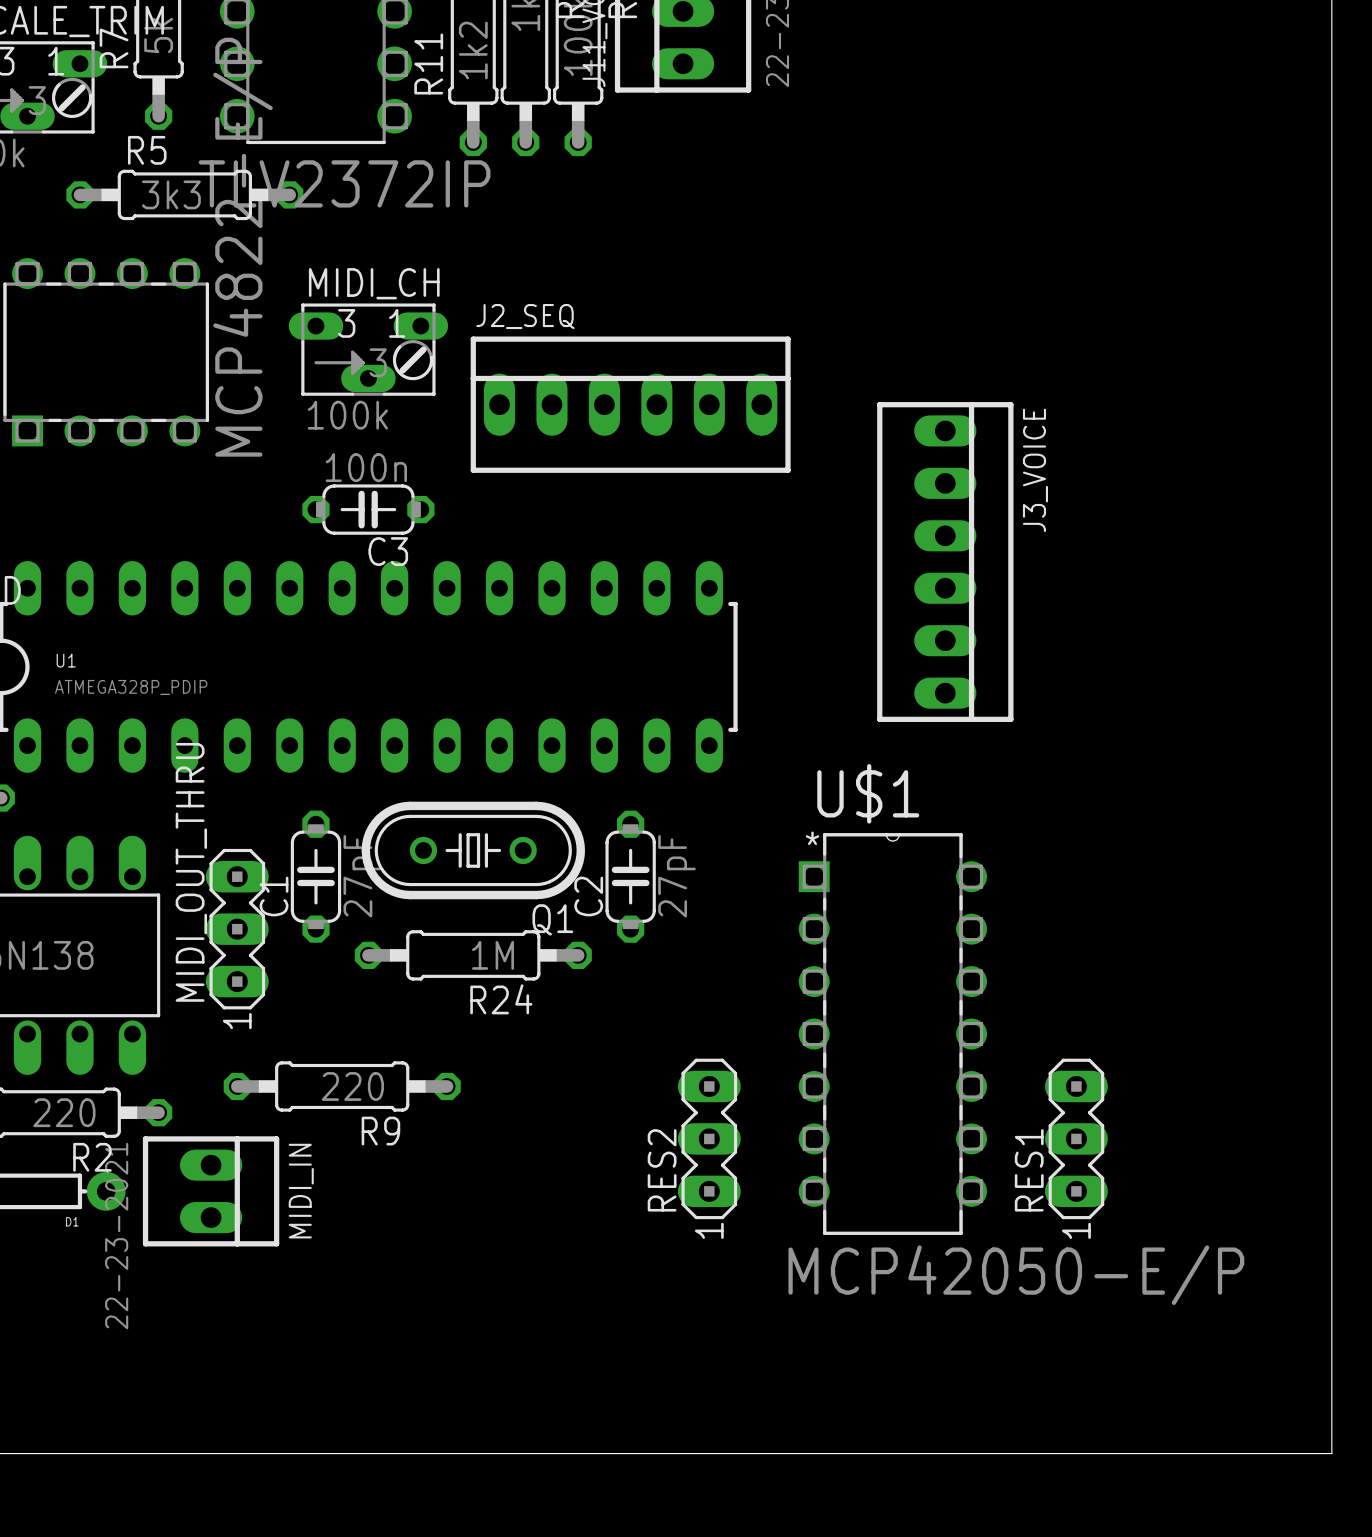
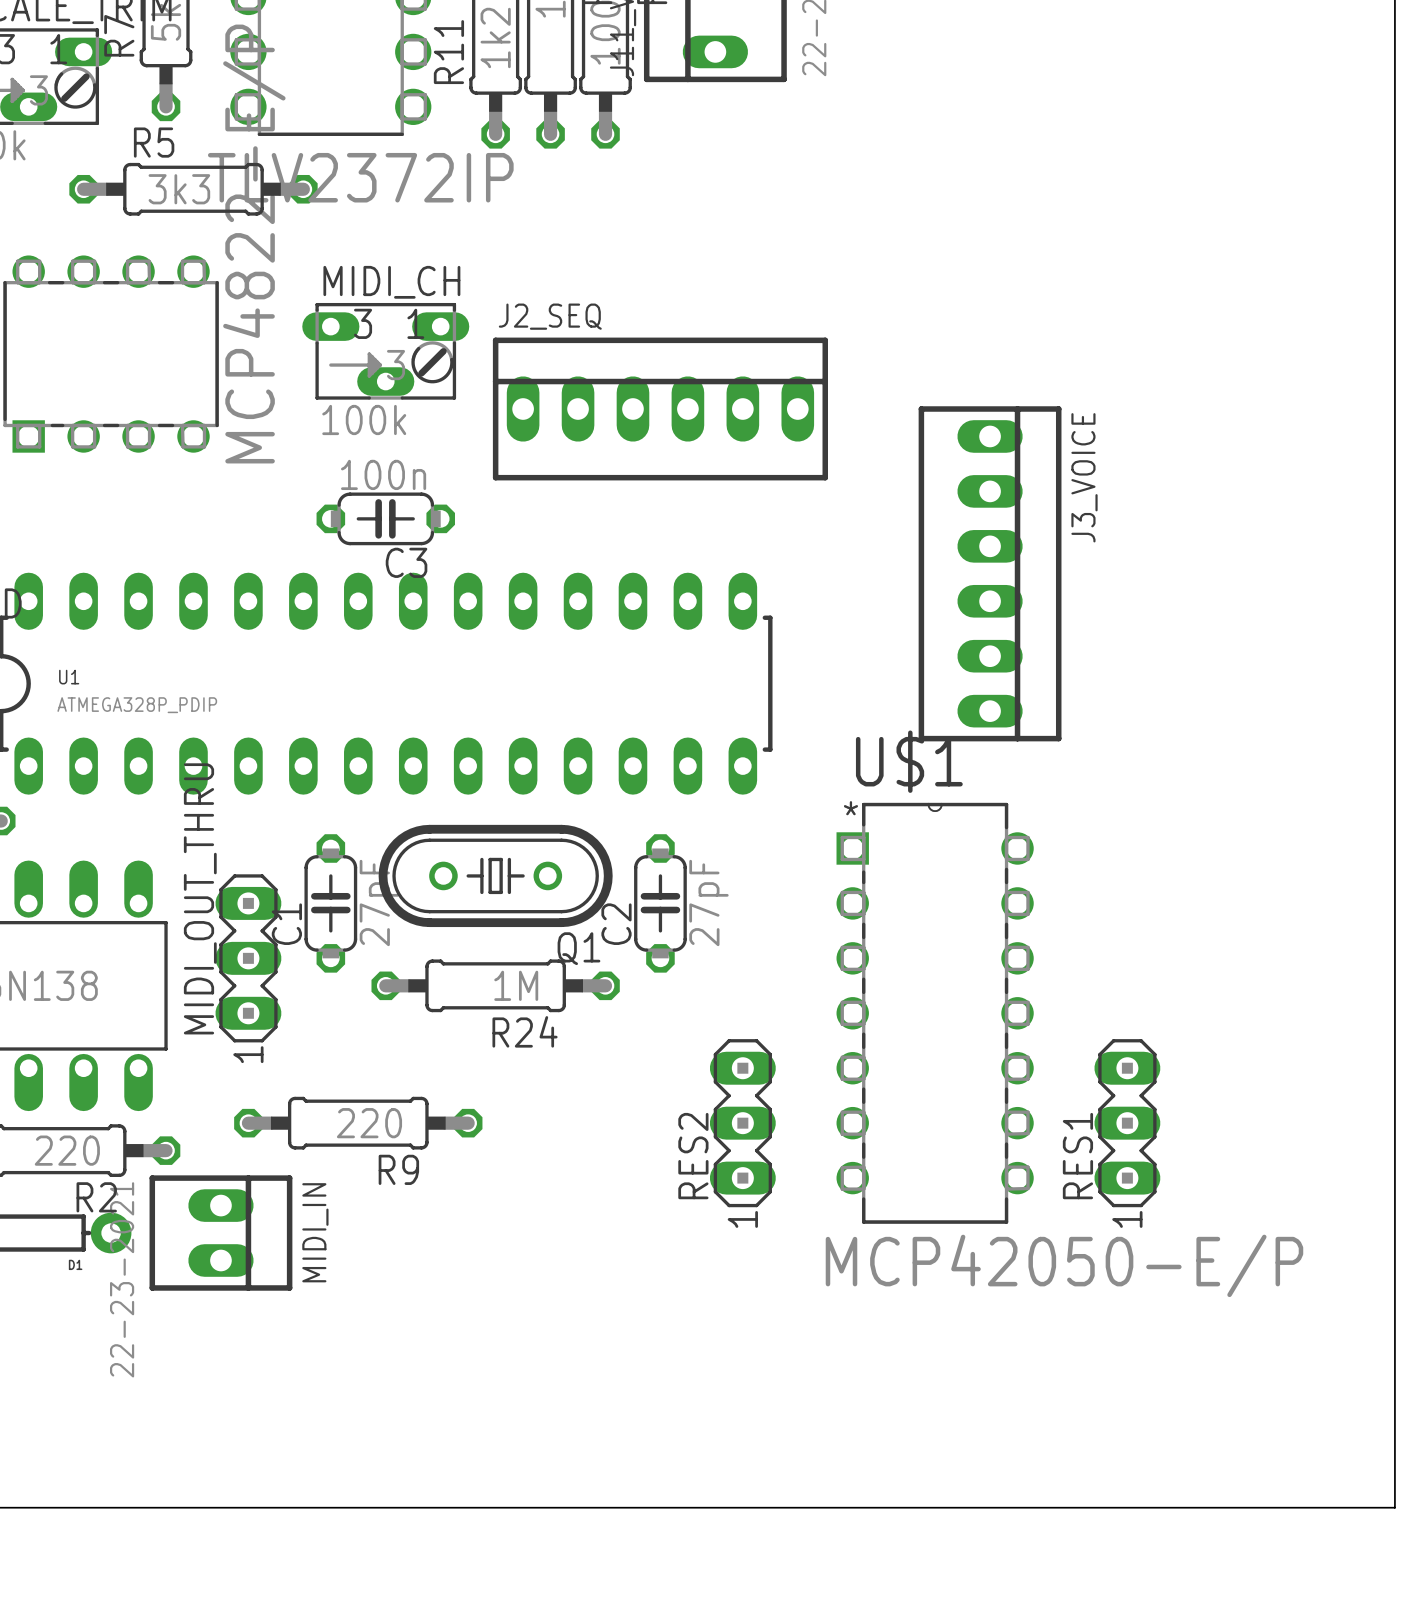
U$1 position: (892, 1034) -> (935, 1013)
RES2 position: (709, 1138) -> (742, 1123)
RES1 position: (1076, 1138) -> (1127, 1123)

